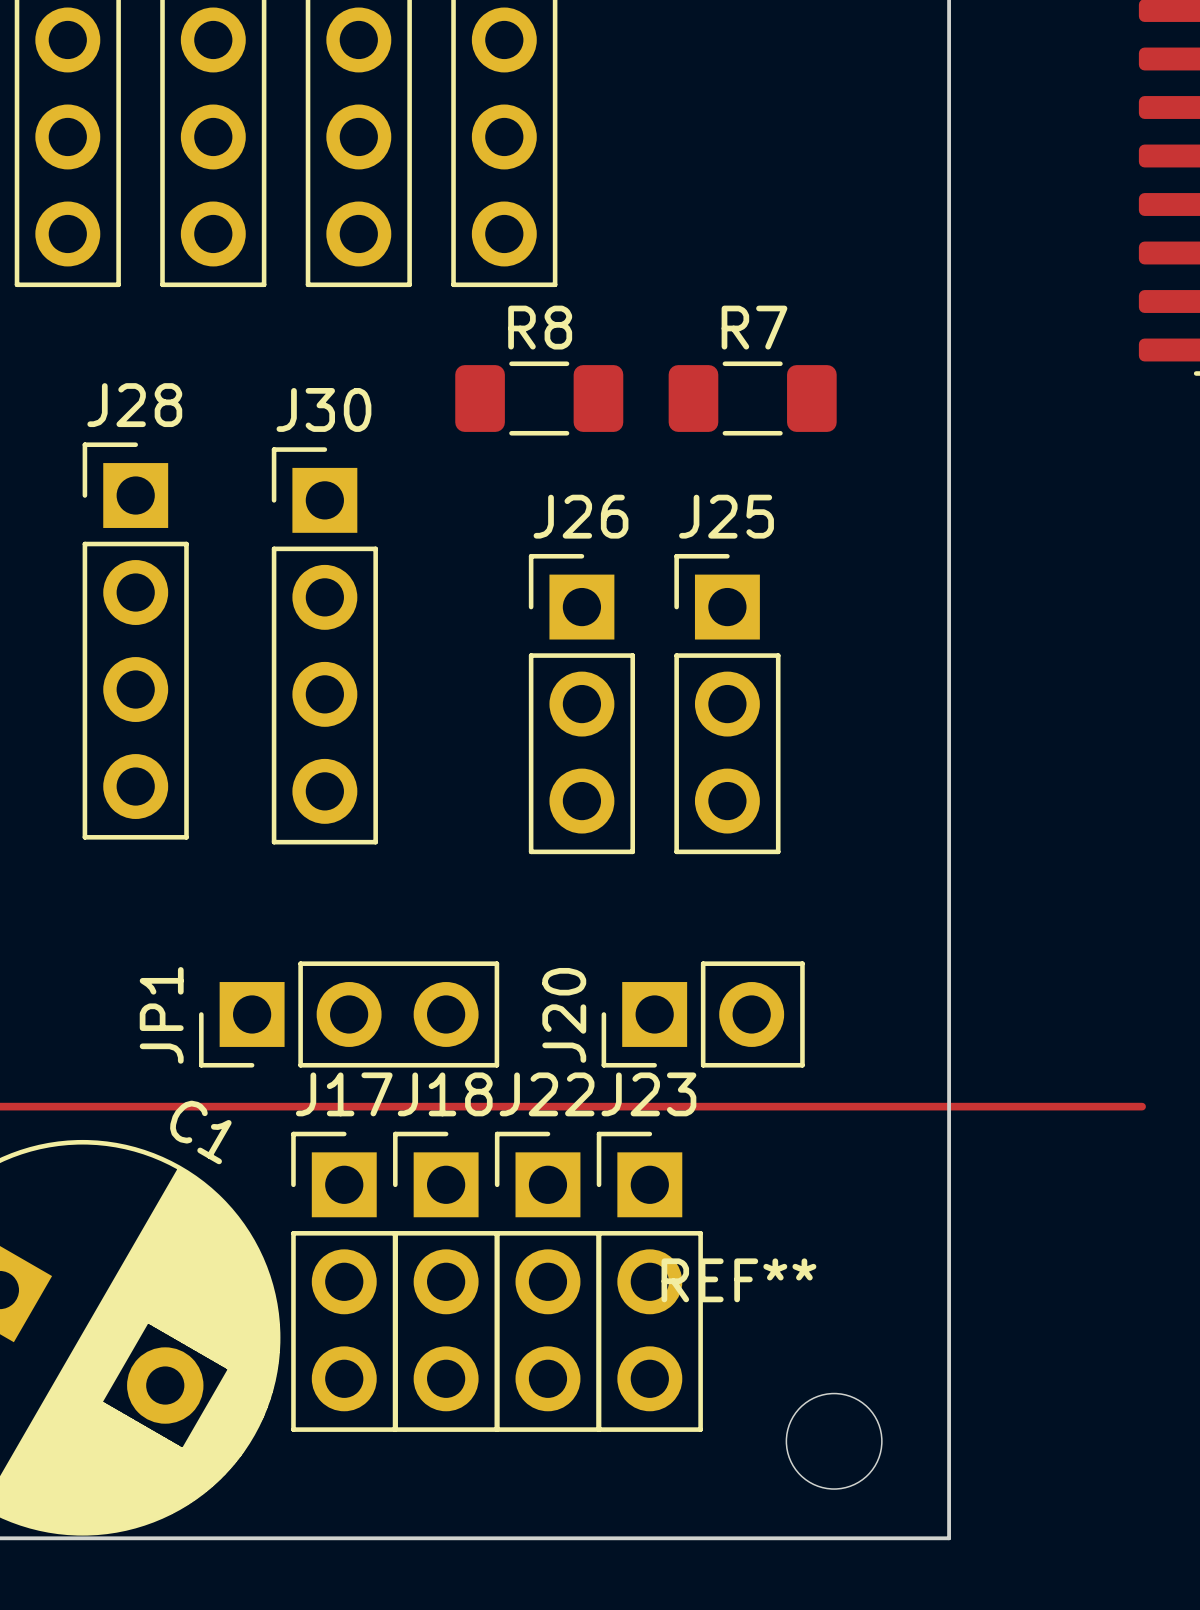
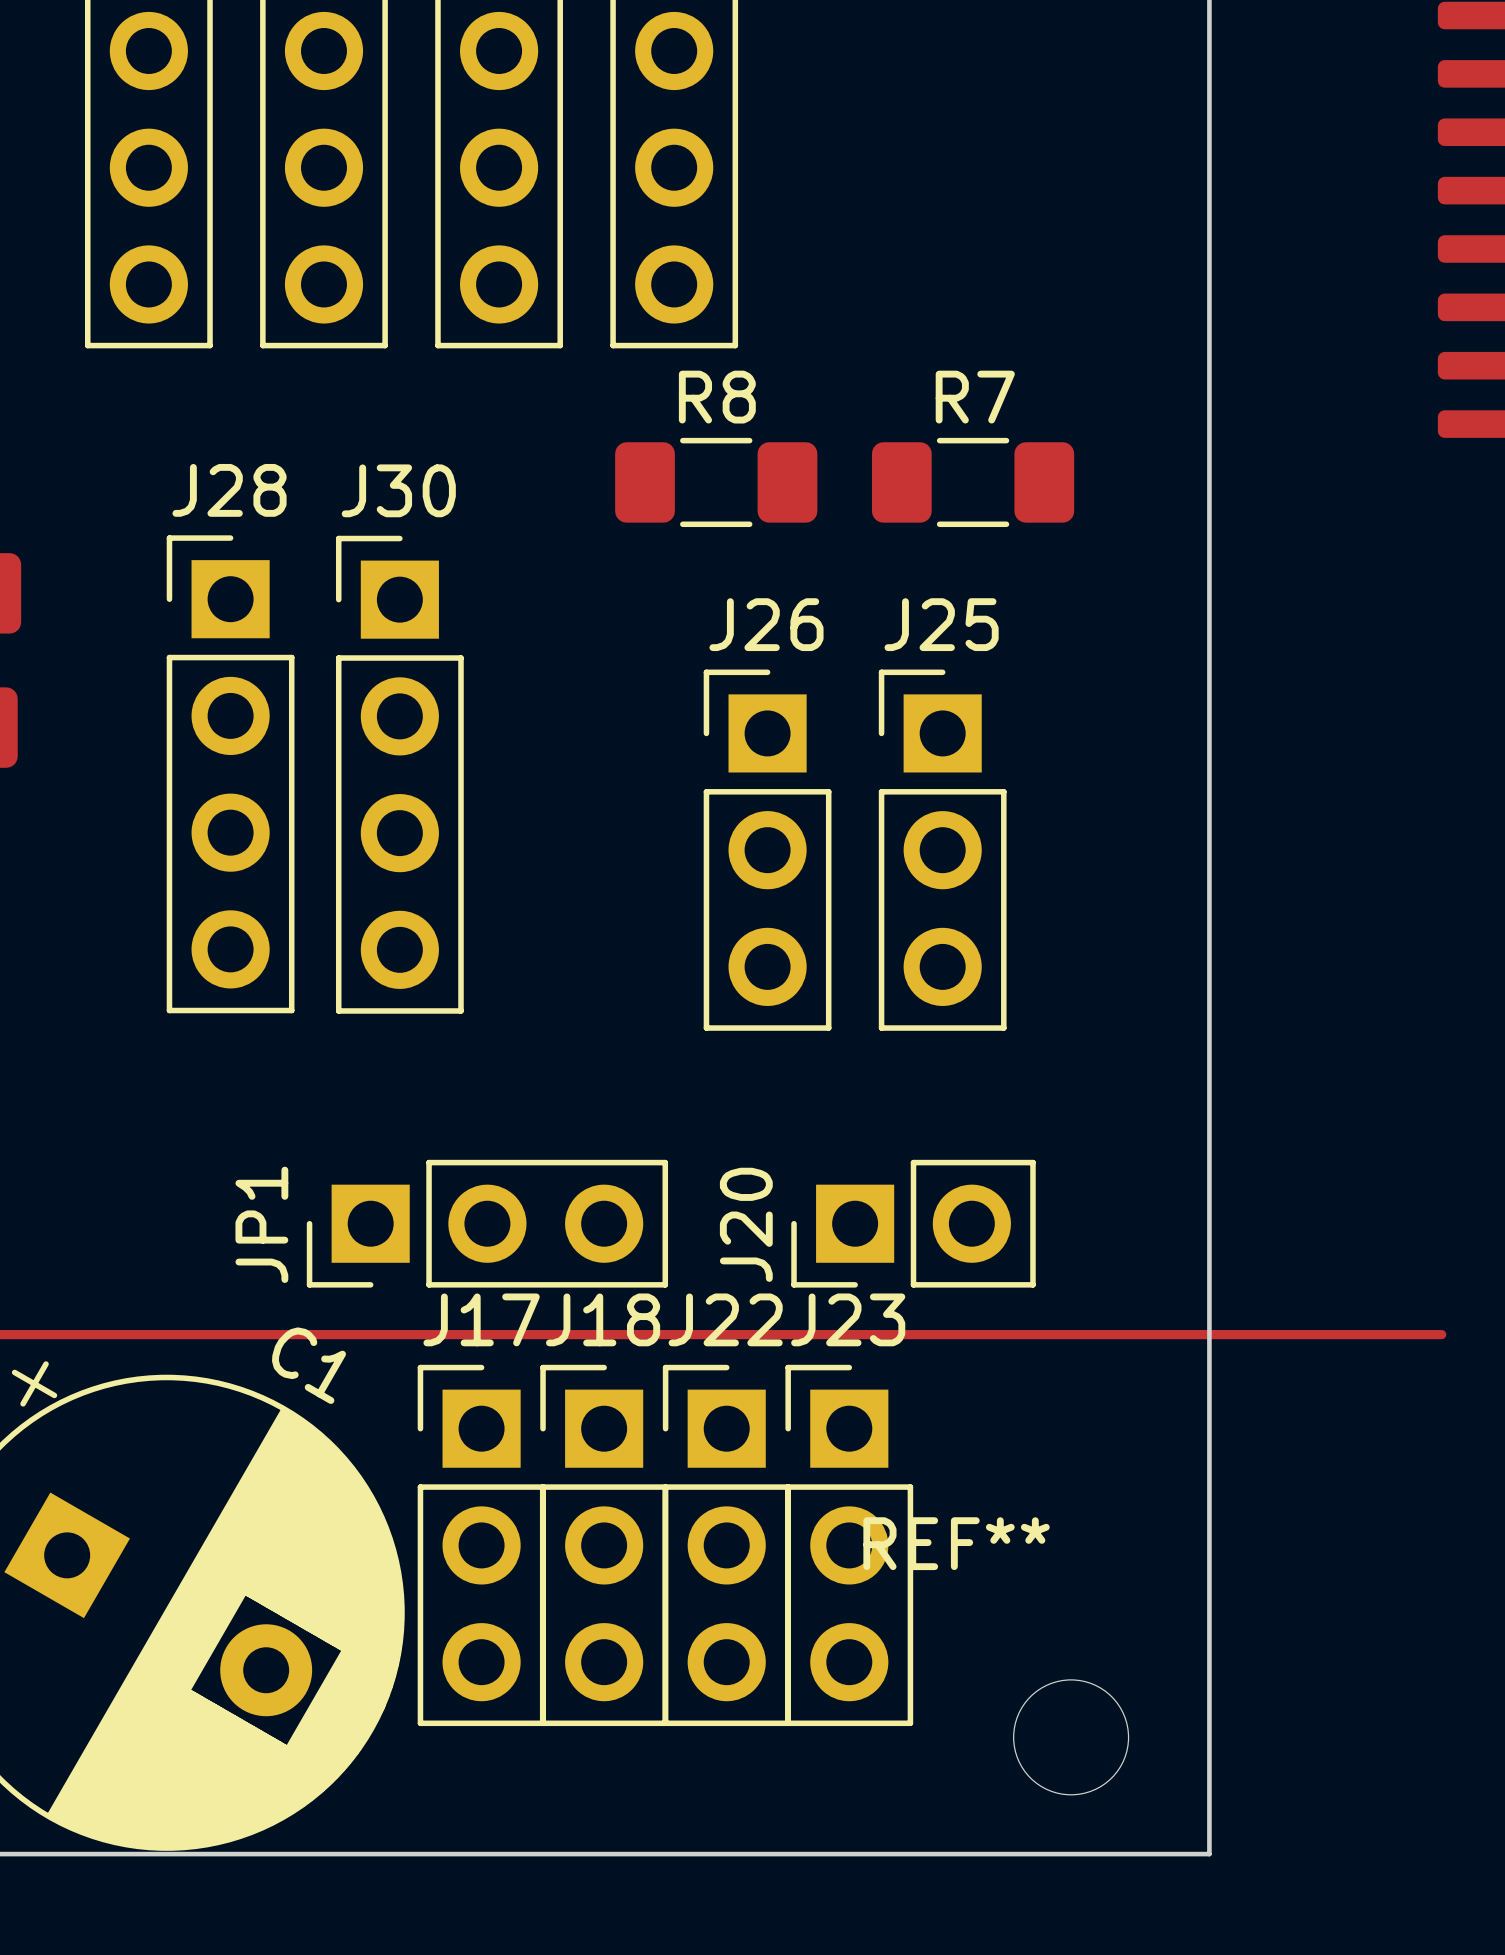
J30 position: (324, 645) -> (399, 774)

